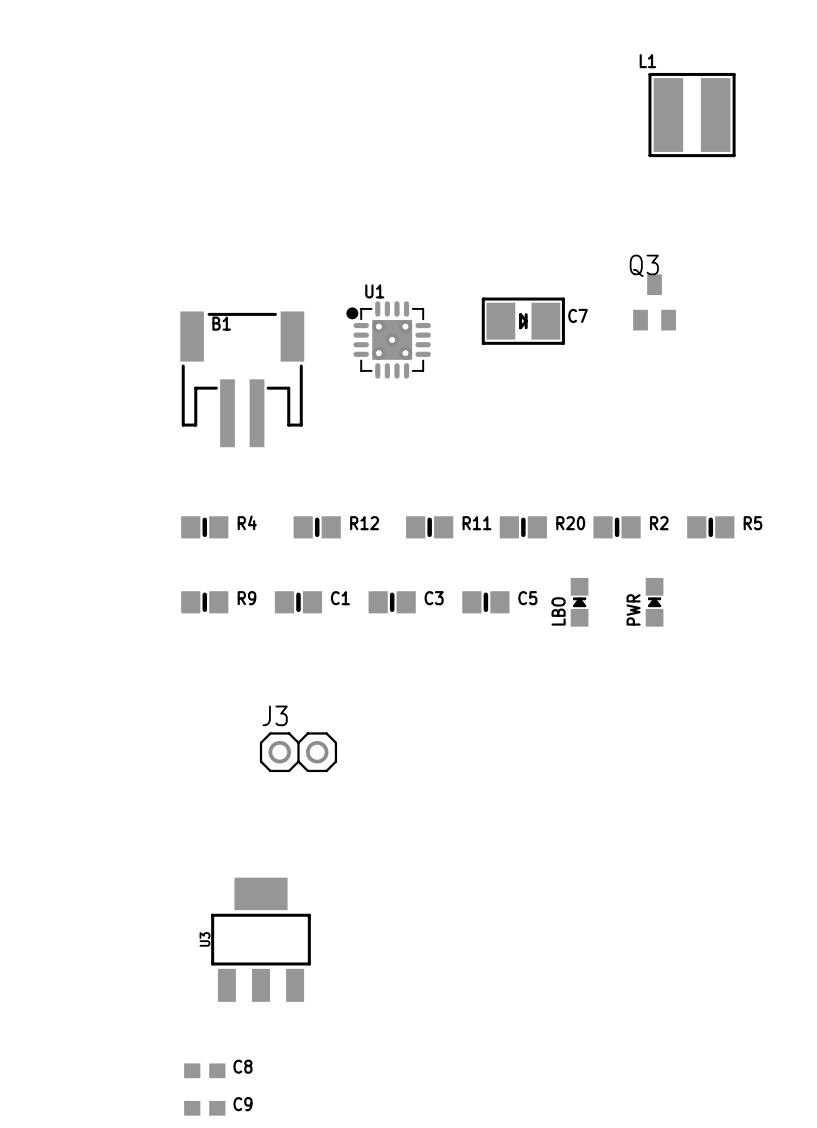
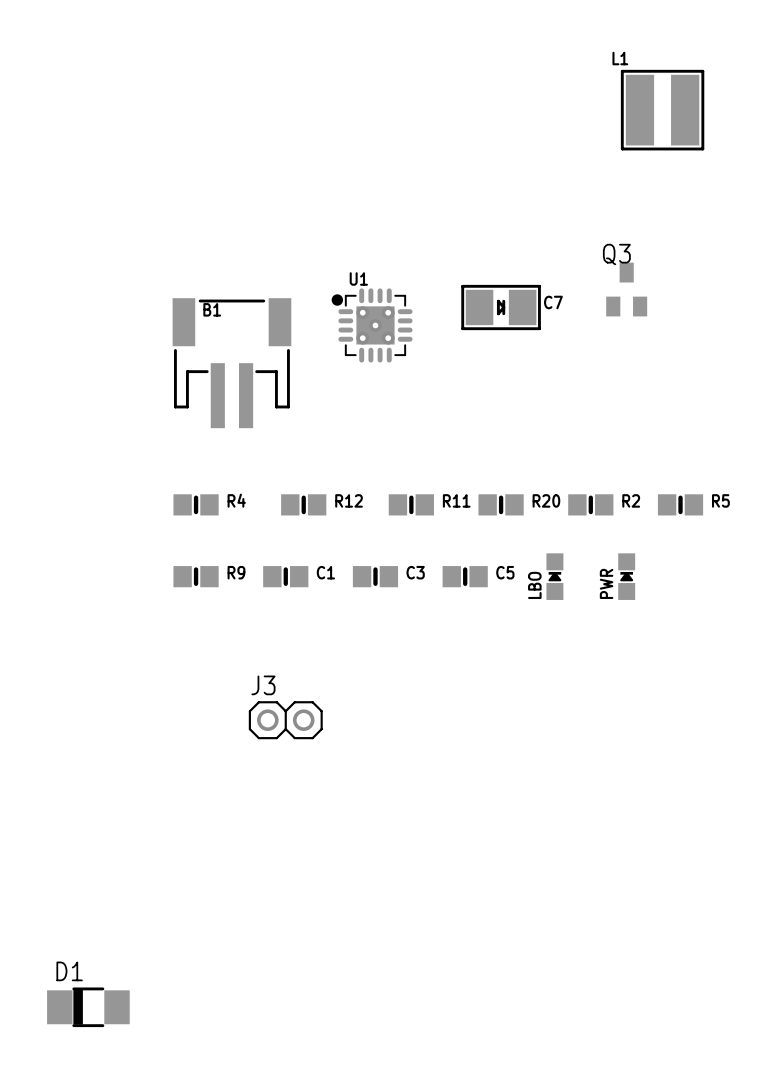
U3: (260, 939) -> none
D1: none -> (88, 1007)
C8: (204, 1070) -> none
C9: (204, 1108) -> none

